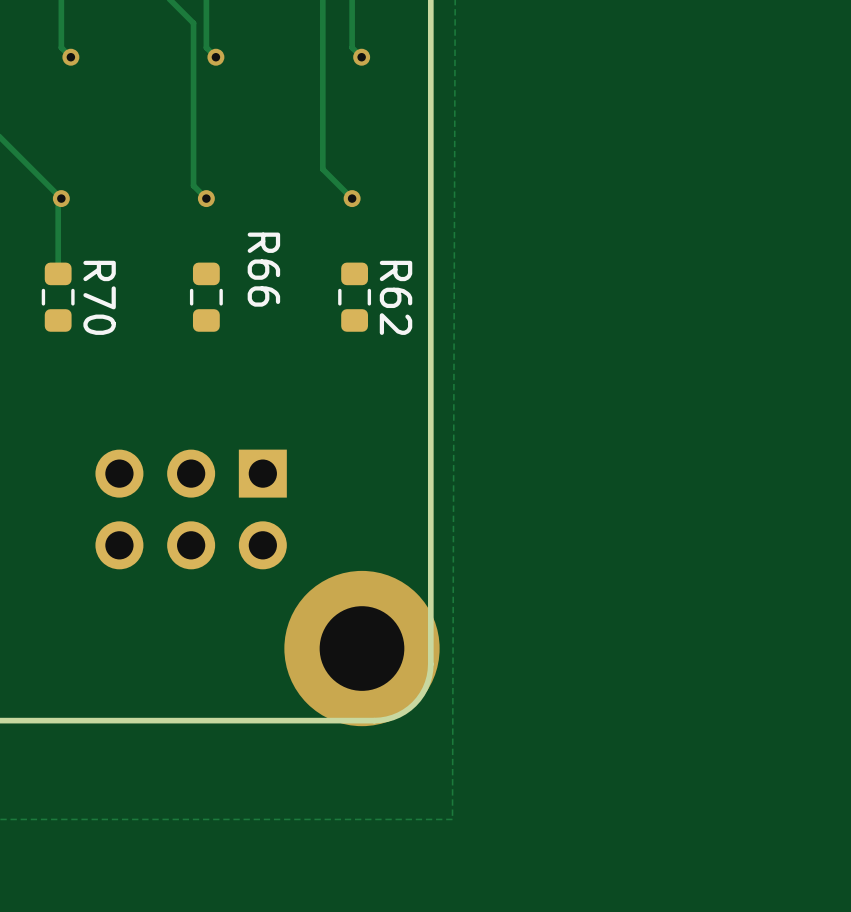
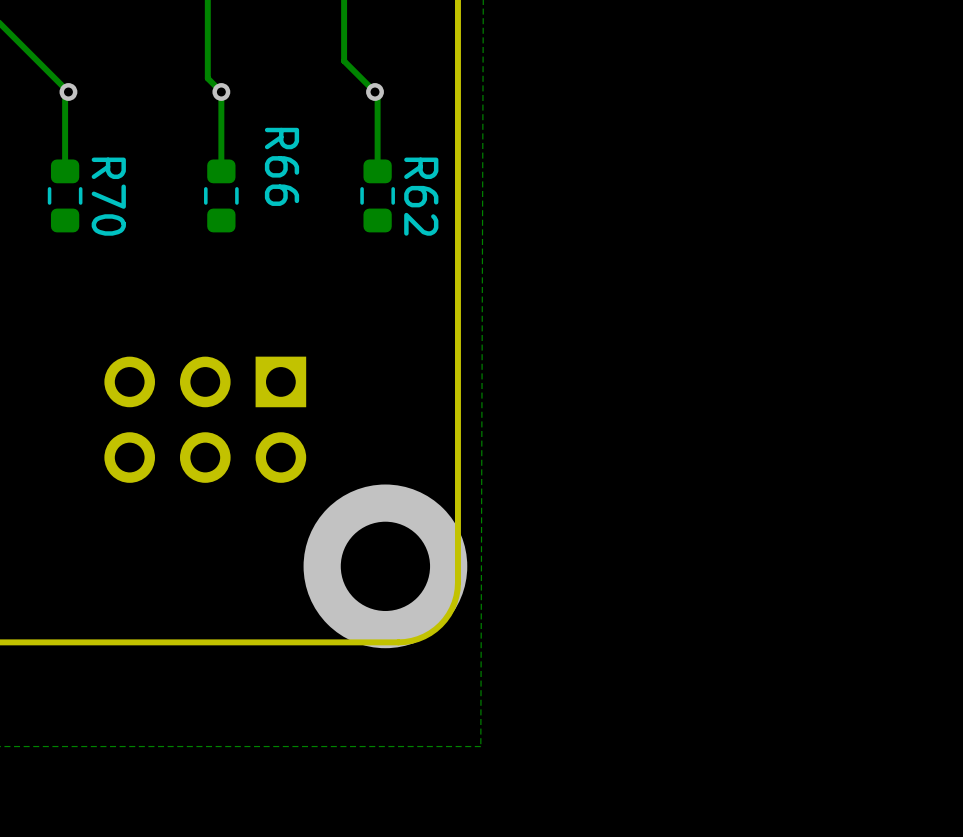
track: none -> (221, 91) (221, 171)
track: none -> (375, 91) (377, 94) (377, 171)

